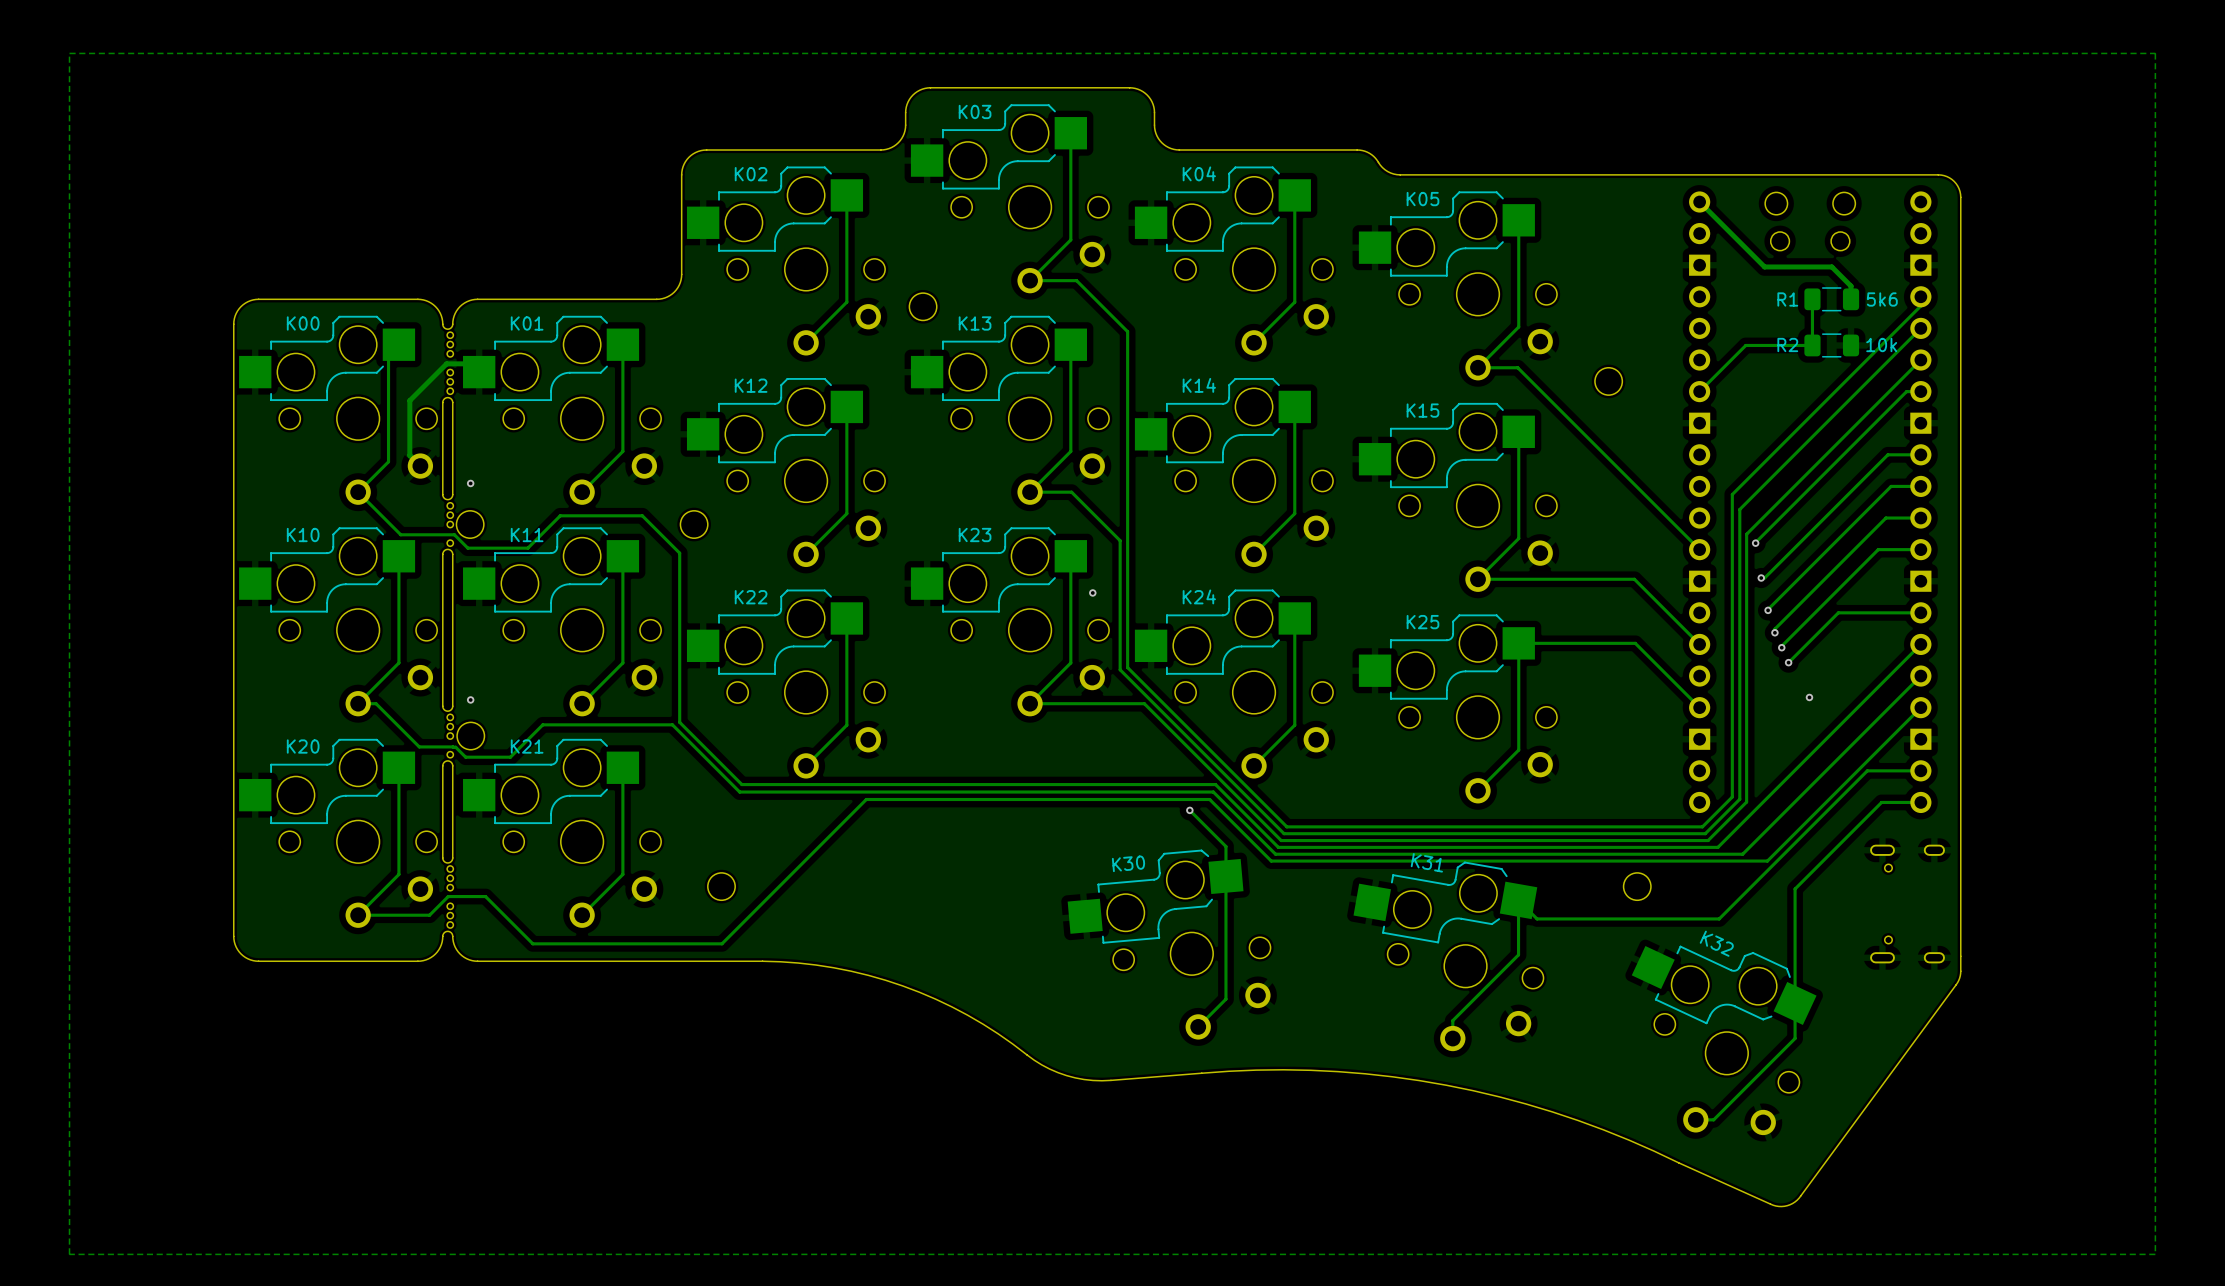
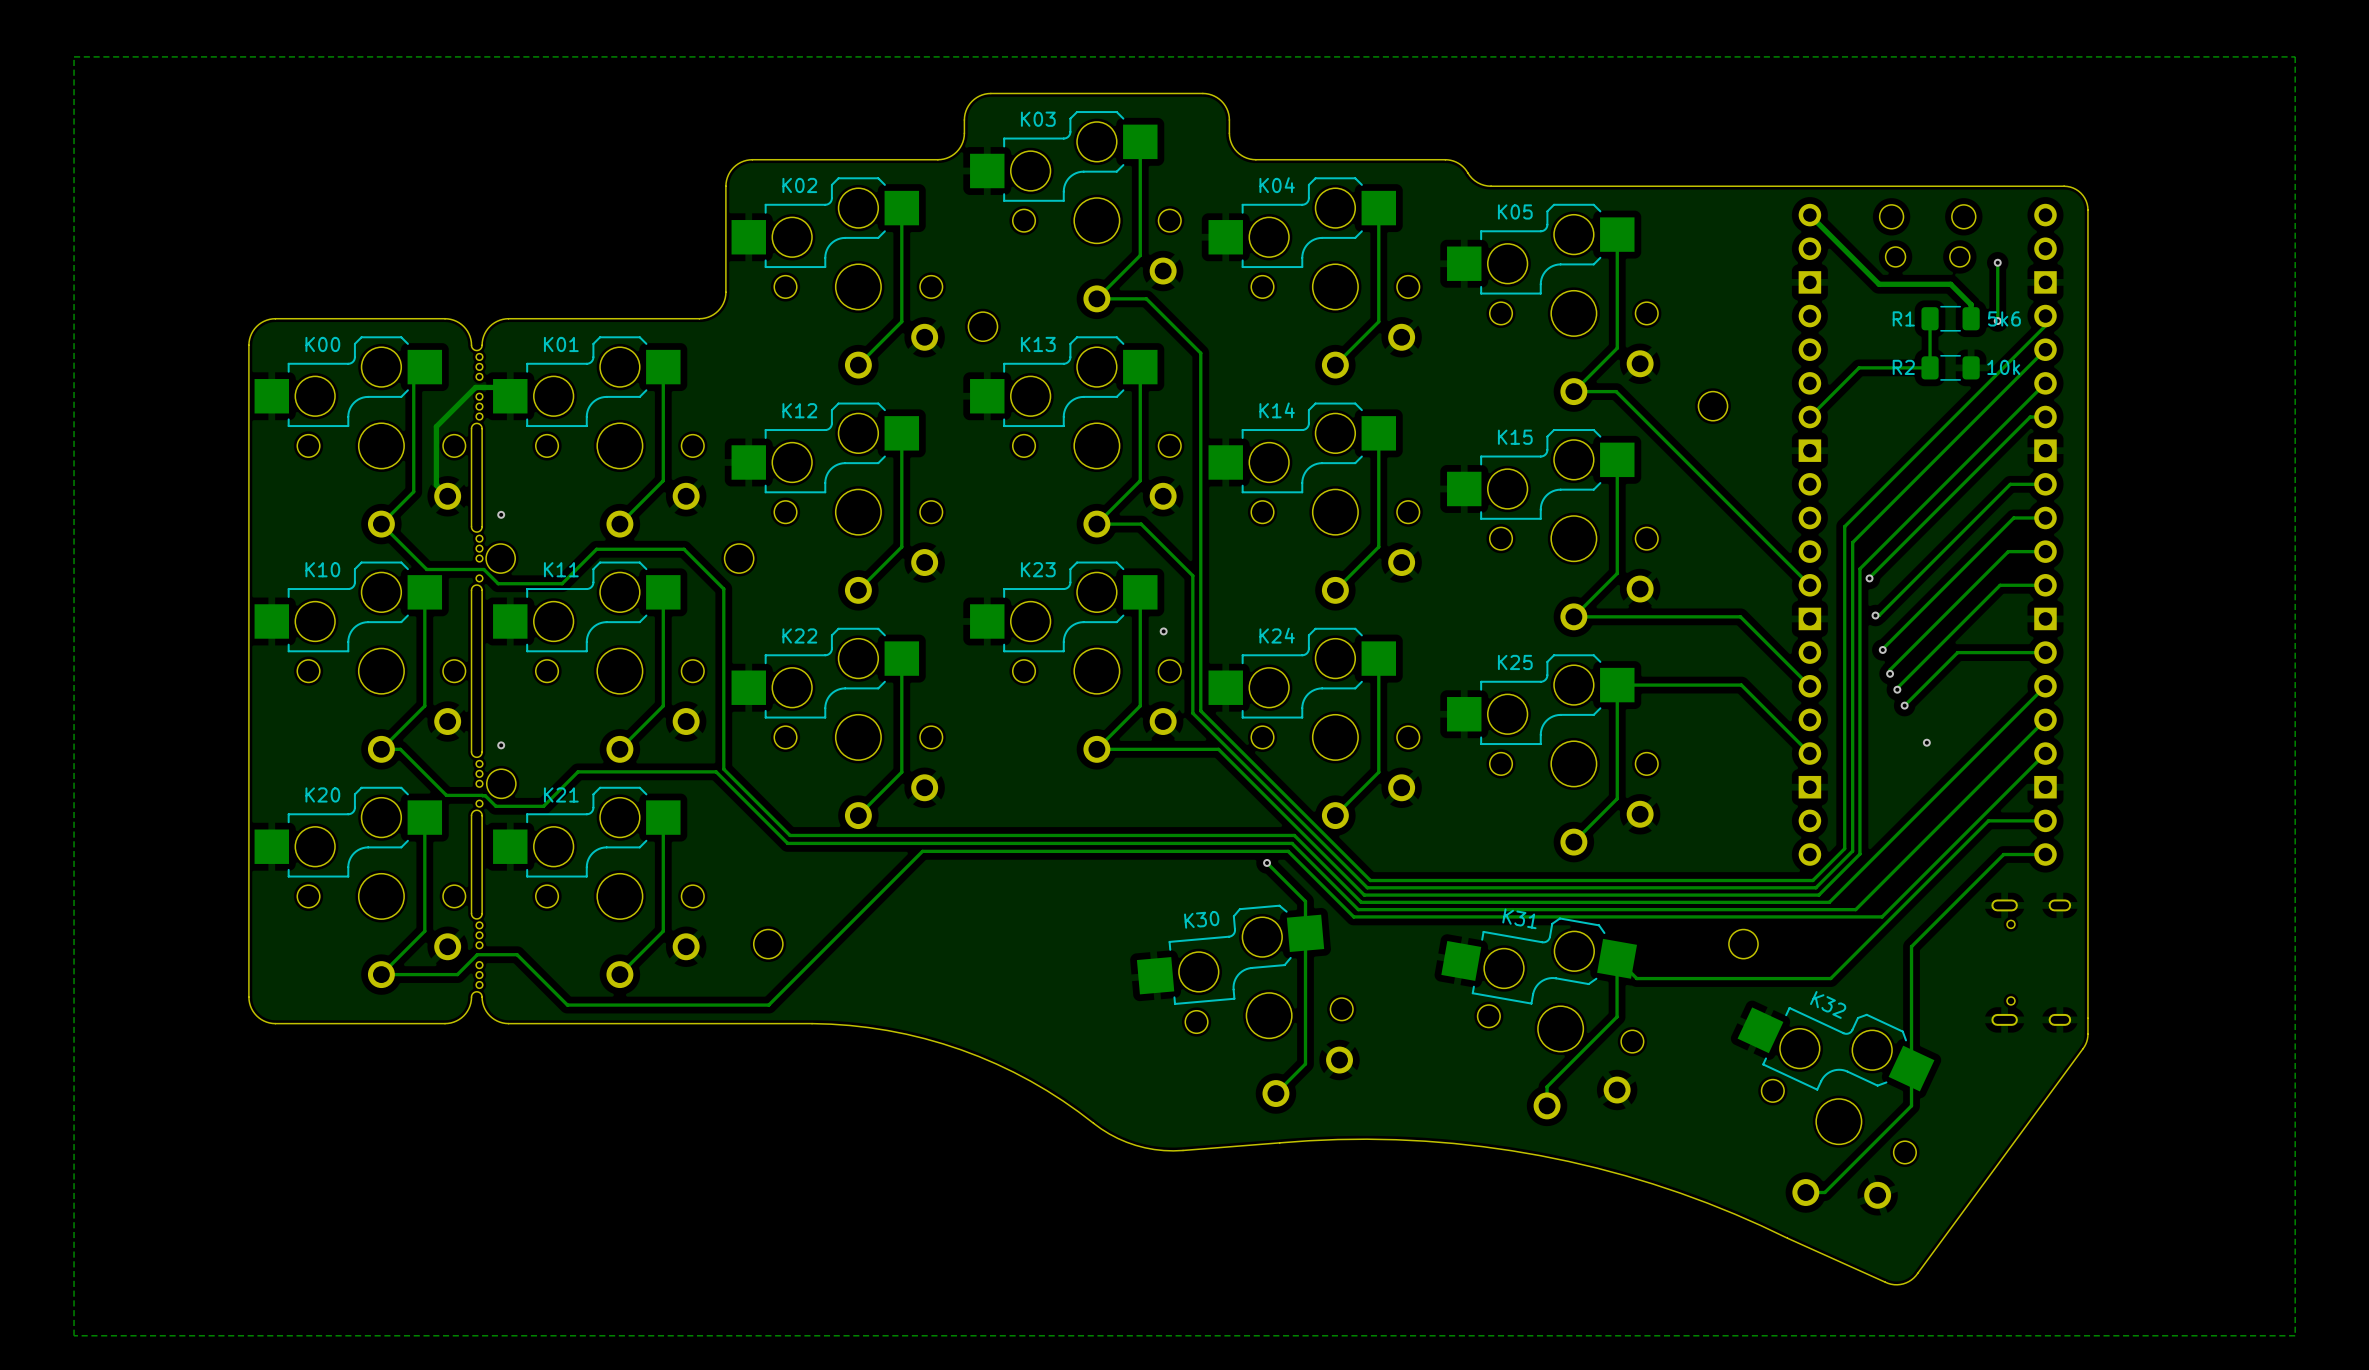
track: none -> (1997, 262) (1997, 321)
via: none -> (1997, 262)
via: none -> (1997, 321)

